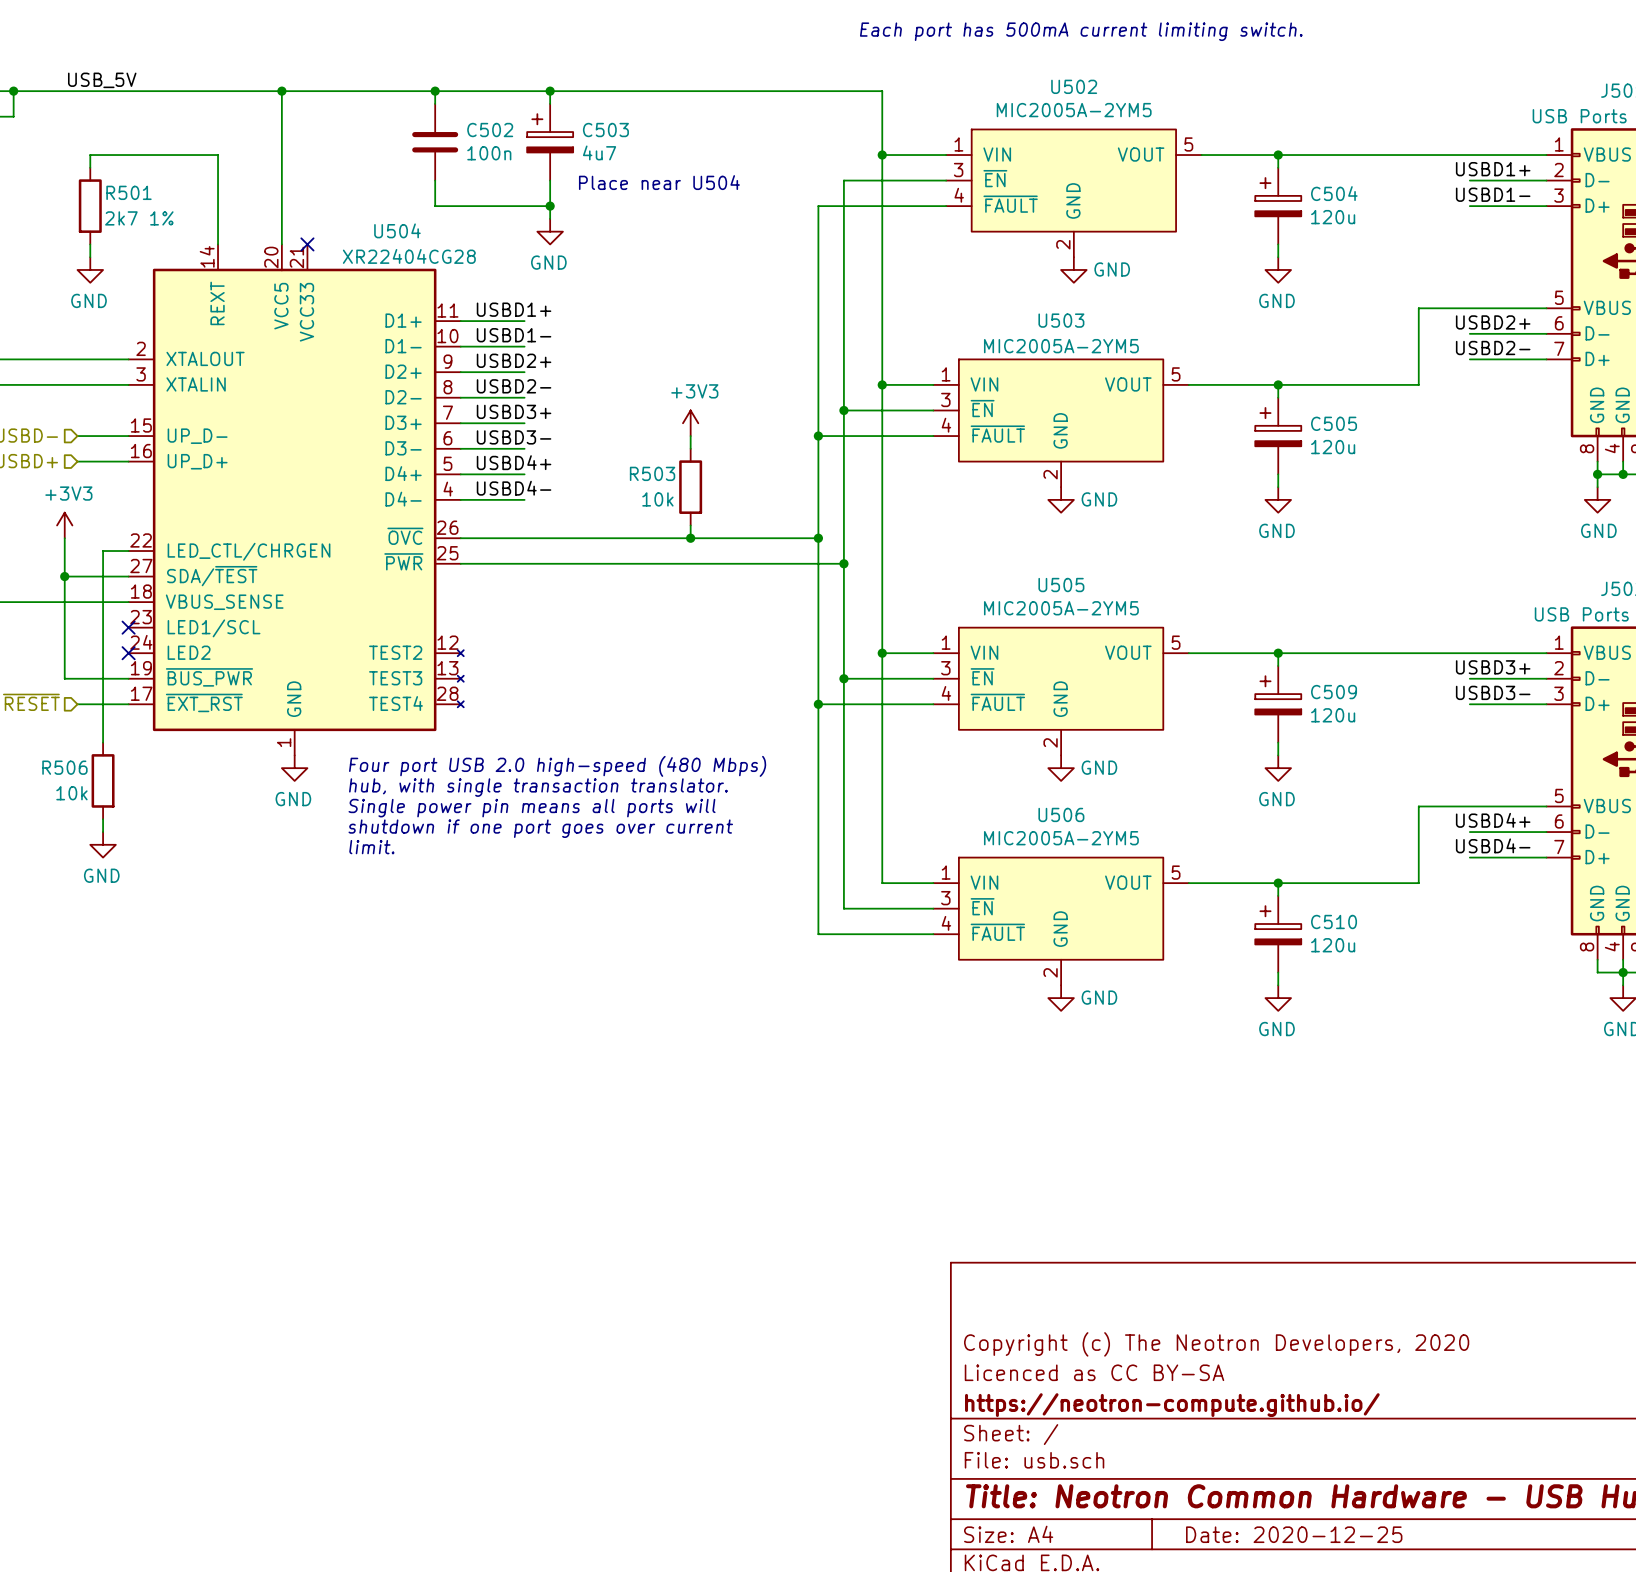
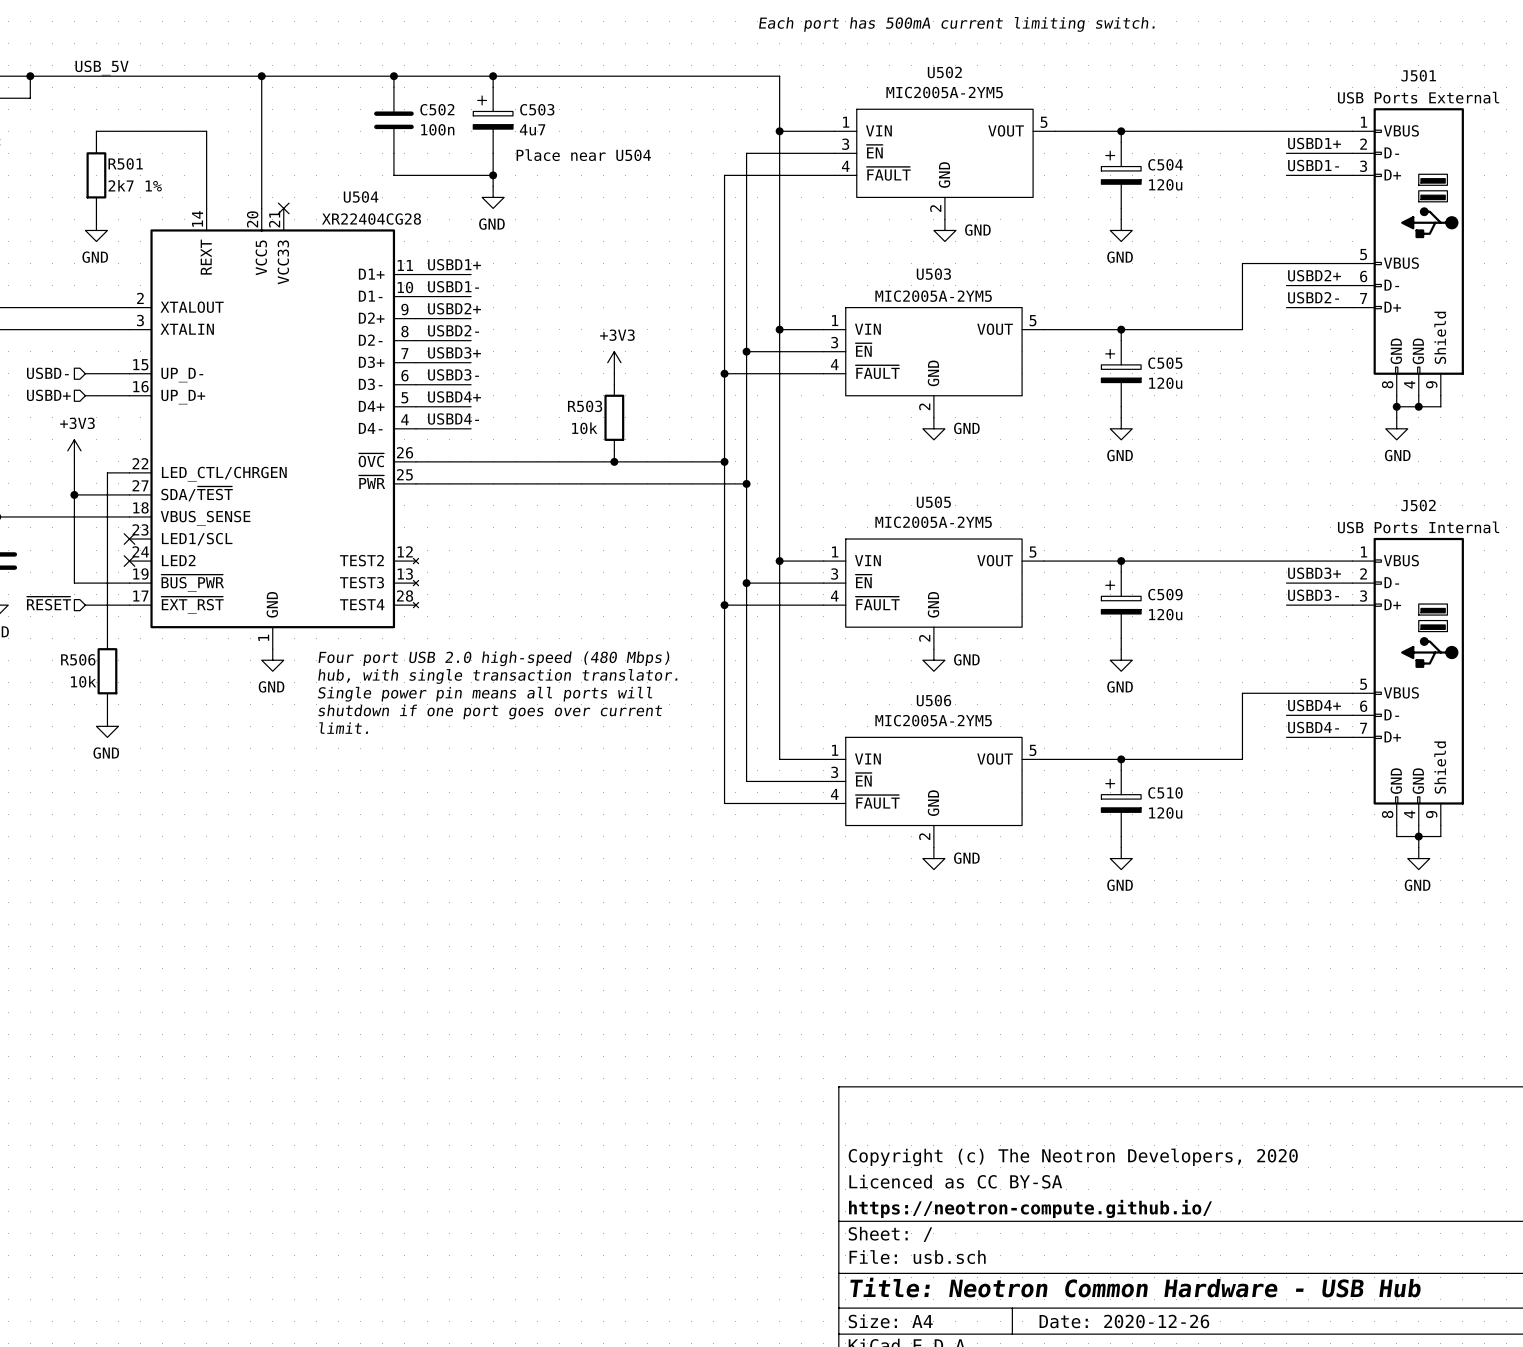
title block: Date: 2020-12-25 (1294, 1534) -> Date: 2020-12-26 (1124, 1321)

